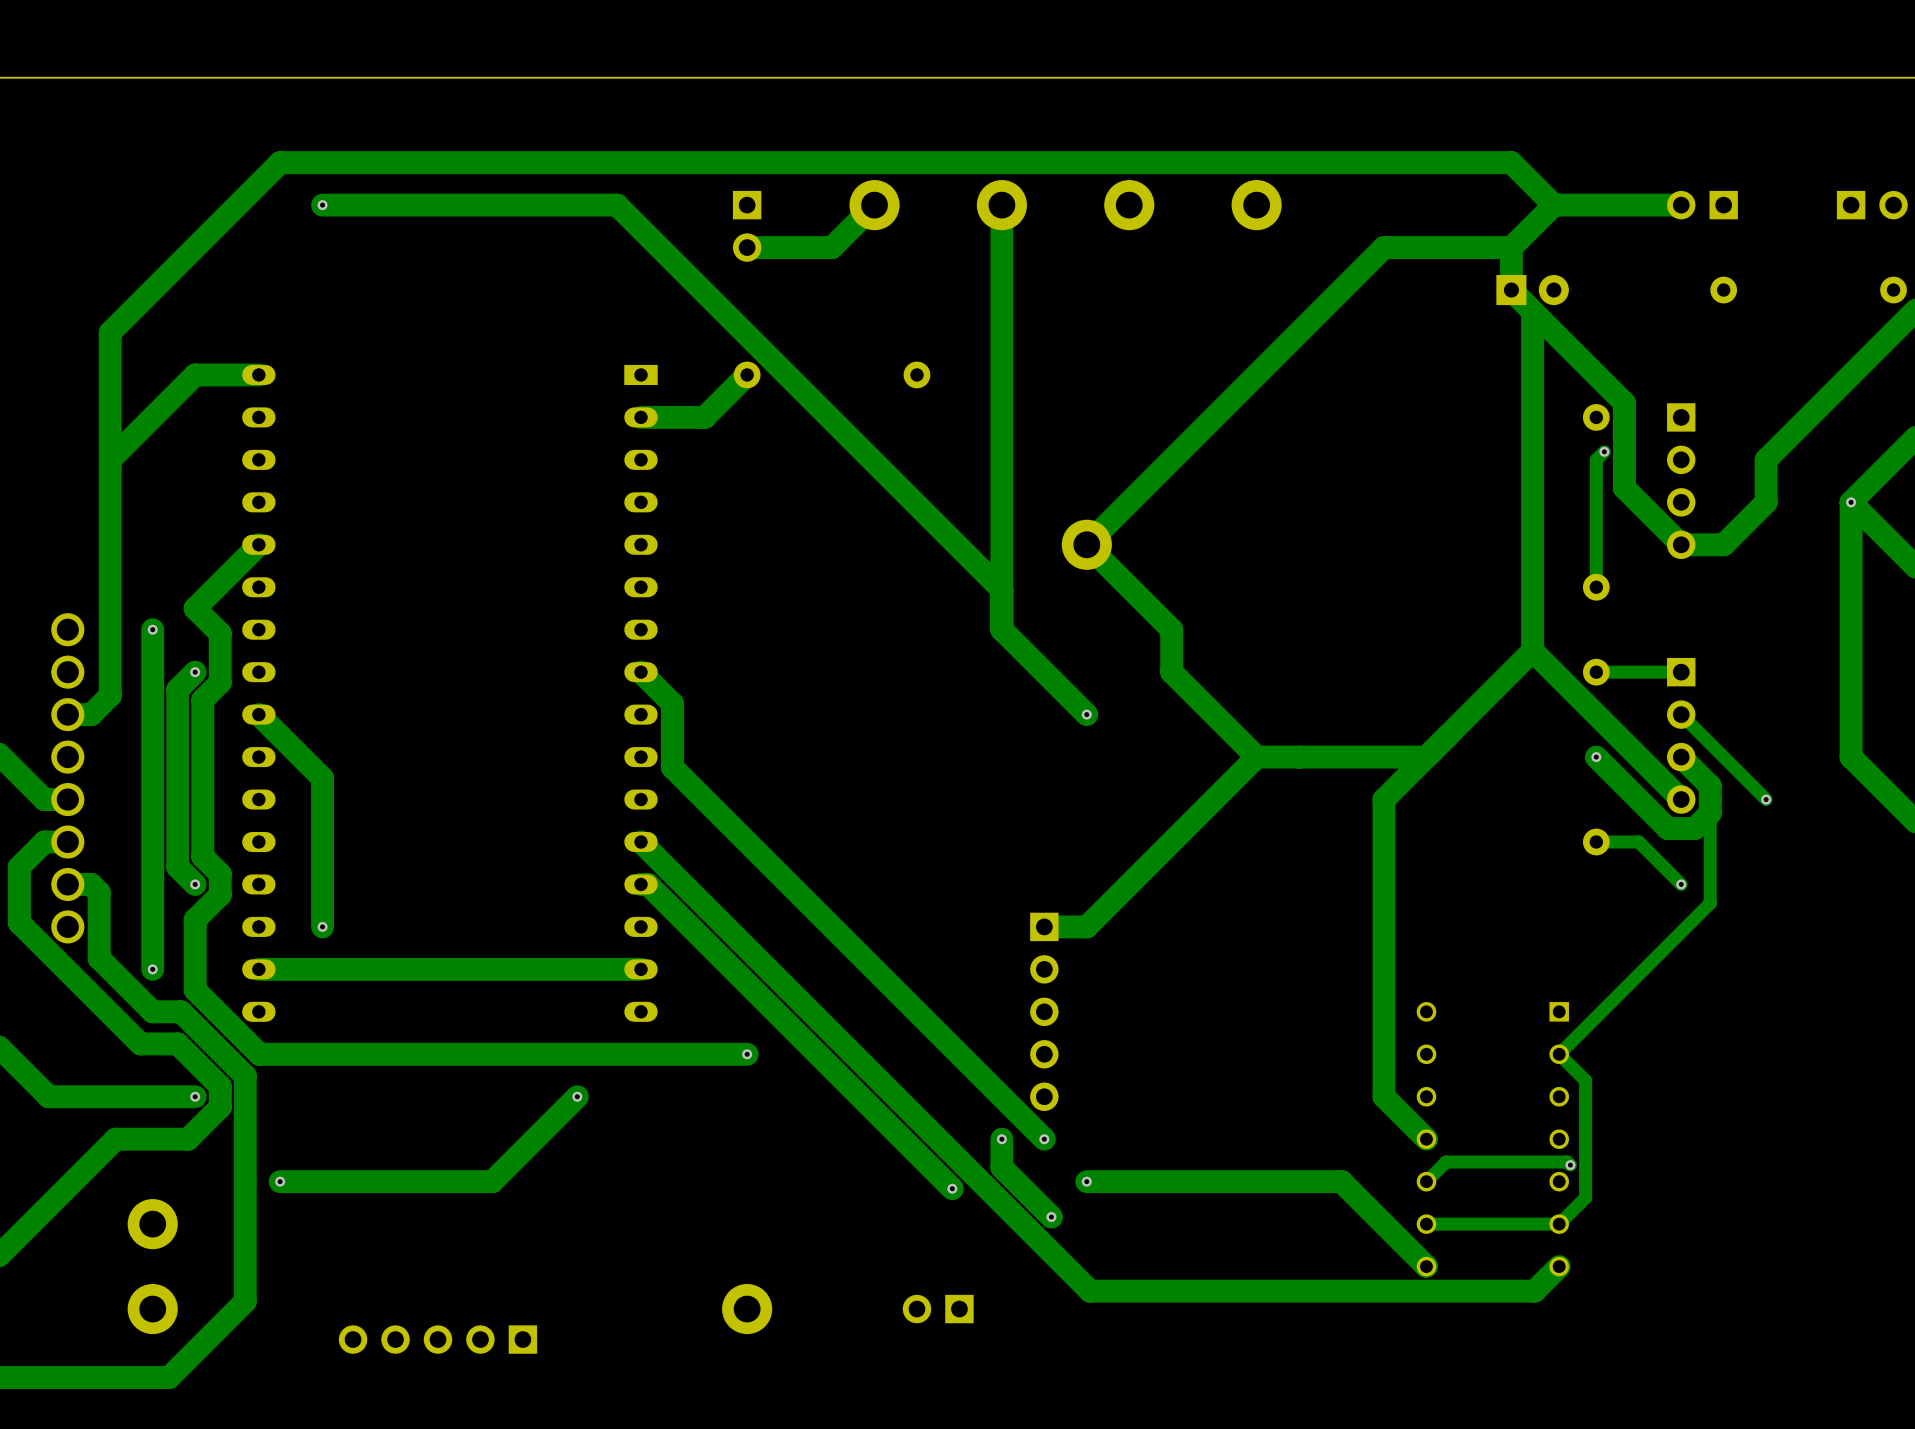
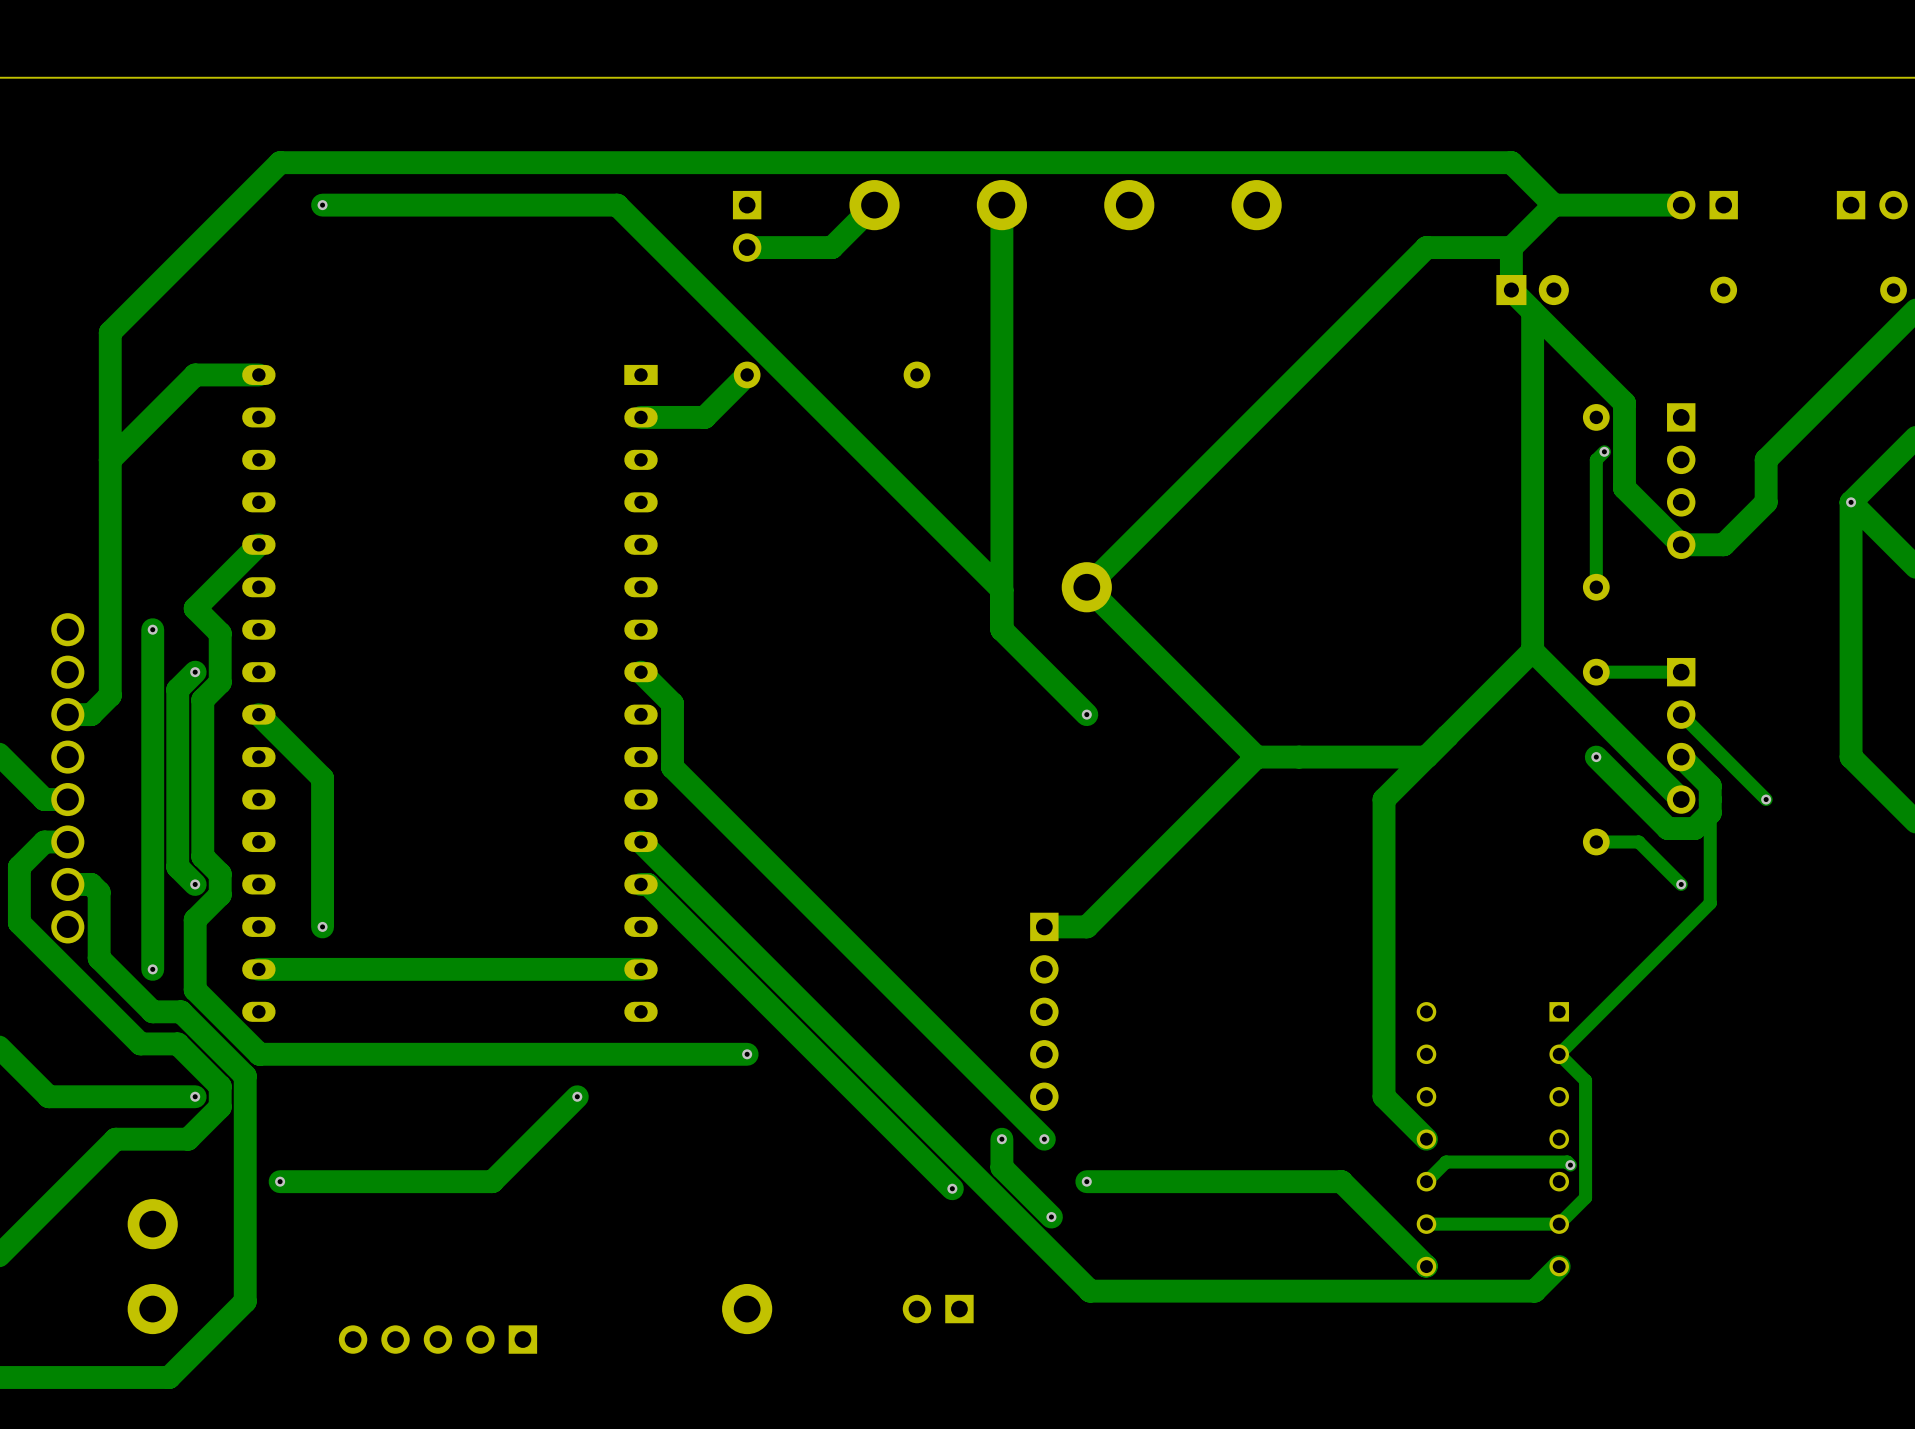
track: (1426, 247) (1384, 247) (1086, 544) (1171, 629) (1171, 672) -> (1426, 247) (1086, 587) (1171, 672)
part position: (1086, 544) -> (1086, 587)

